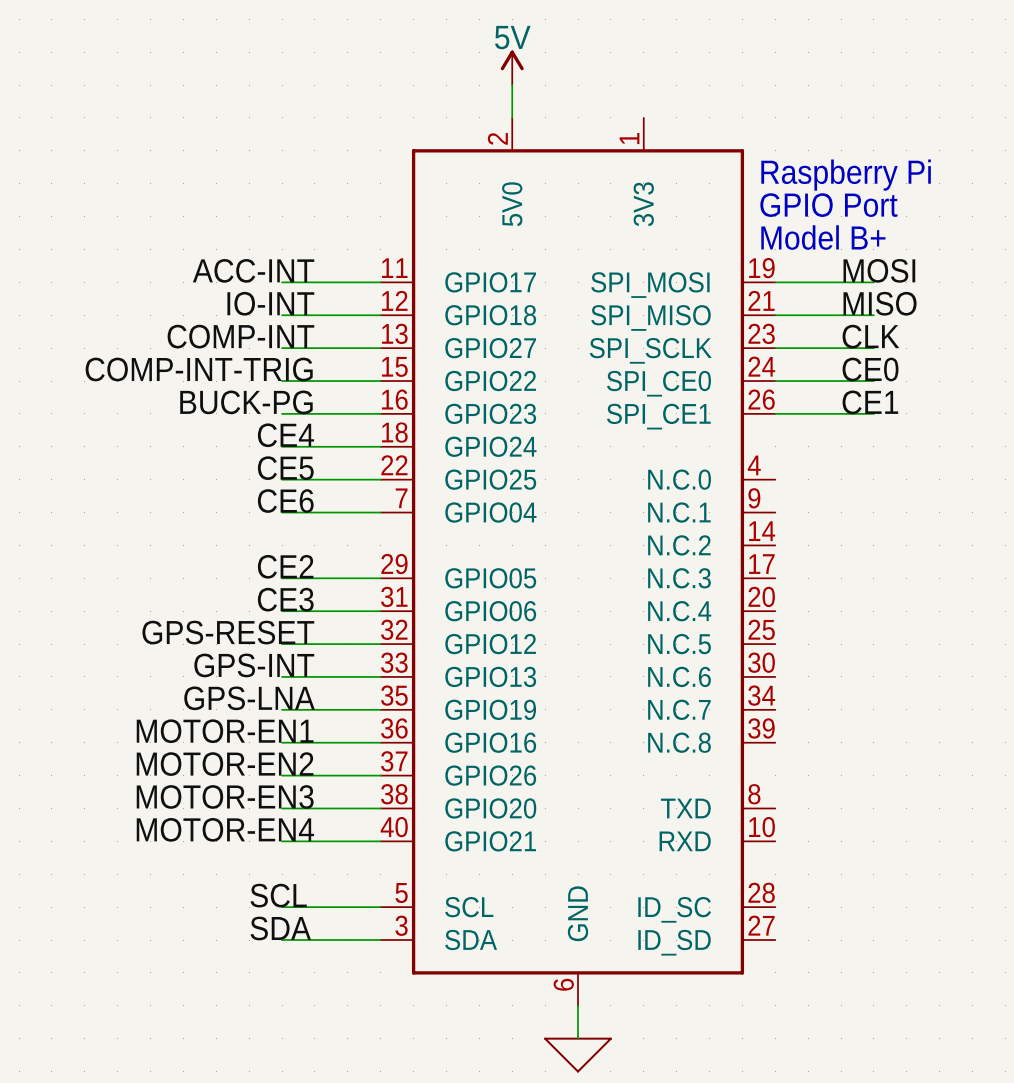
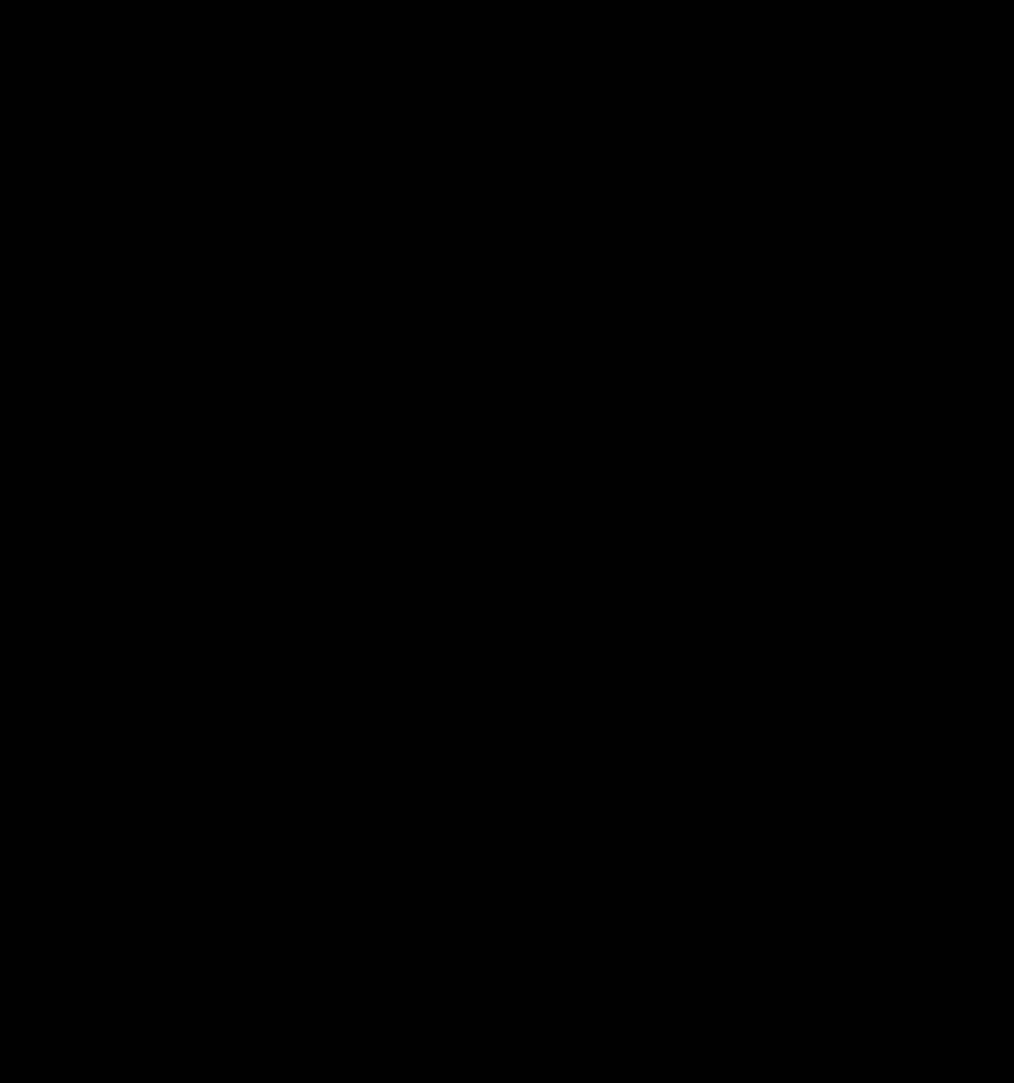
power symbol: 5V (512, 67) -> none
wire: (512, 85) (512, 117) -> none
label: ACC-INT (253, 270) -> none
label: MOSI (879, 270) -> none
wire: (282, 282) (380, 282) -> none
wire: (775, 282) (873, 282) -> none
label: IO-INT (270, 303) -> none
label: MISO (880, 303) -> none
wire: (282, 315) (380, 315) -> none
wire: (775, 315) (873, 315) -> none
label: COMP-INT (240, 336) -> none
label: CLK (870, 336) -> none
wire: (282, 348) (380, 348) -> none
wire: (775, 348) (873, 348) -> none
label: COMP-INT-TRIG (199, 369) -> none
label: CE0 (870, 369) -> none
wire: (282, 381) (380, 381) -> none
wire: (775, 381) (873, 381) -> none
label: BUCK-PG (246, 402) -> none
label: CE1 (870, 402) -> none
wire: (282, 413) (380, 413) -> none
wire: (775, 413) (873, 413) -> none
label: CE4 (285, 435) -> none
wire: (282, 446) (380, 446) -> none
label: CE5 (285, 468) -> none
wire: (282, 479) (380, 479) -> none
label: CE6 (285, 501) -> none
wire: (282, 512) (380, 512) -> none
part: (578, 561) -> none
label: CE2 (285, 566) -> none
wire: (282, 578) (380, 578) -> none
label: CE3 (285, 599) -> none
wire: (282, 611) (380, 611) -> none
label: GPS-RESET (228, 632) -> none
wire: (282, 644) (380, 644) -> none
label: GPS-INT (254, 665) -> none
wire: (282, 676) (380, 676) -> none
label: GPS-LNA (249, 698) -> none
wire: (282, 709) (380, 709) -> none
label: MOTOR-EN1 (225, 731) -> none
wire: (282, 742) (380, 742) -> none
label: MOTOR-EN2 (225, 764) -> none
wire: (282, 775) (380, 775) -> none
label: MOTOR-EN3 (225, 796) -> none
wire: (282, 808) (380, 808) -> none
label: MOTOR-EN4 (225, 829) -> none
wire: (282, 841) (380, 841) -> none
label: SCL (278, 895) -> none
wire: (282, 907) (380, 907) -> none
label: SDA (280, 928) -> none
wire: (282, 940) (380, 940) -> none
wire: (578, 1005) (578, 1038) -> none
power symbol: (578, 1055) -> none

